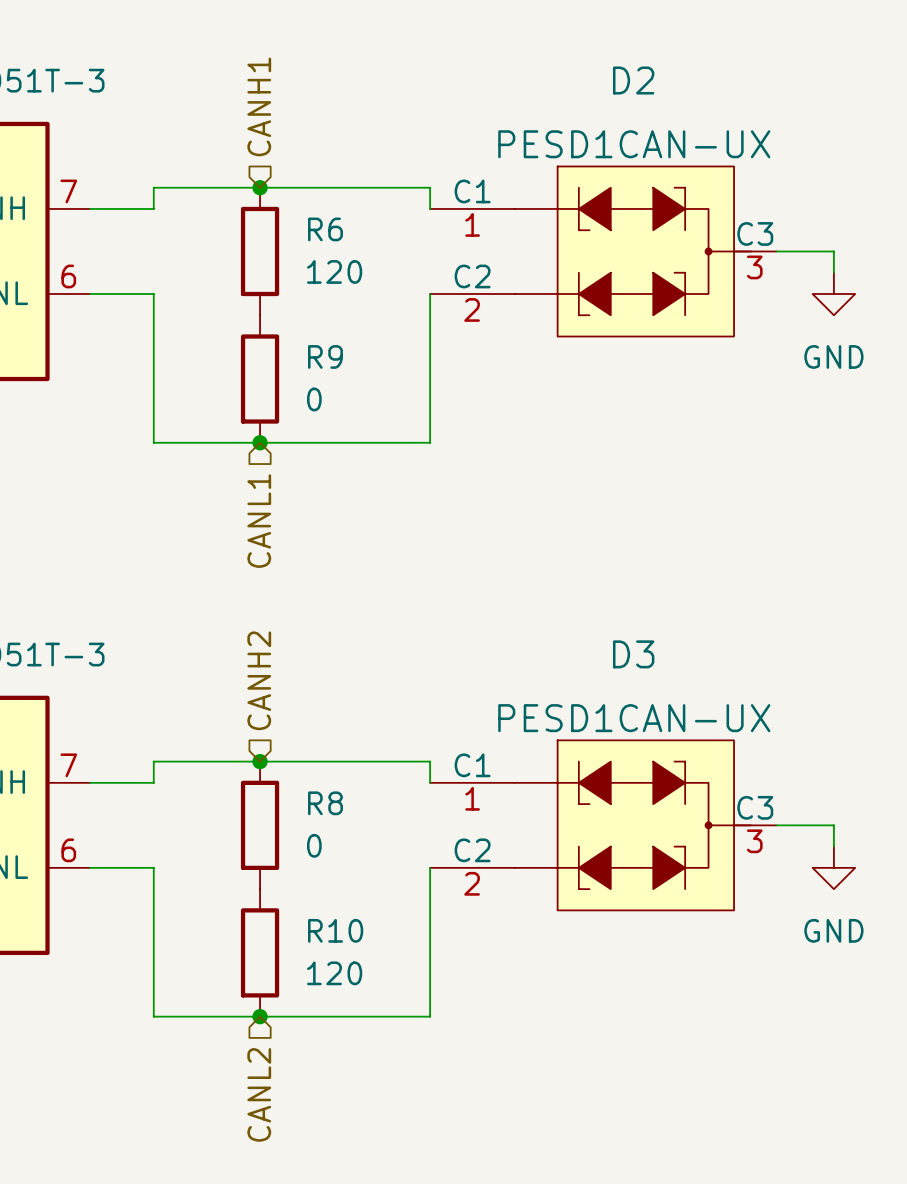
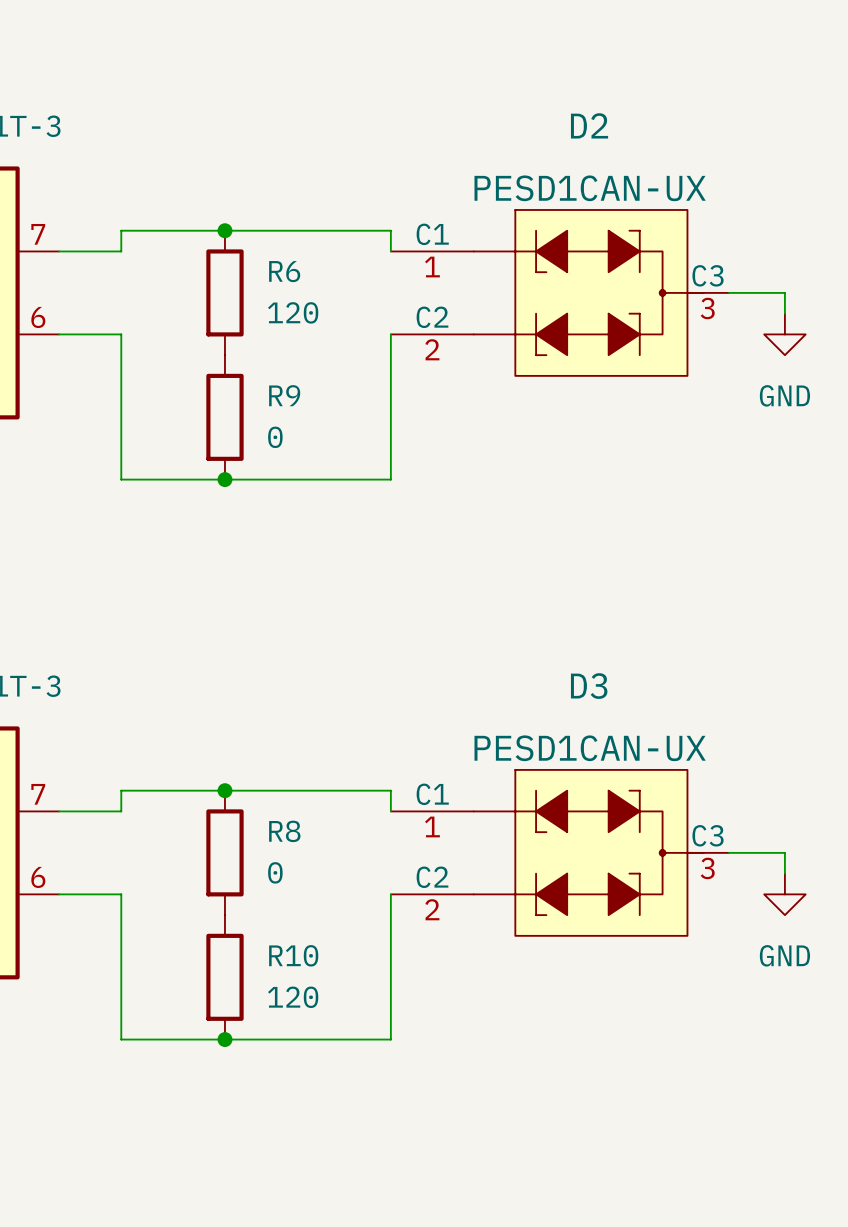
hierarchical label: CANH1 (259, 106) -> none
hierarchical label: CANL1 (259, 521) -> none
hierarchical label: CANH2 (259, 680) -> none
hierarchical label: CANL2 (259, 1094) -> none

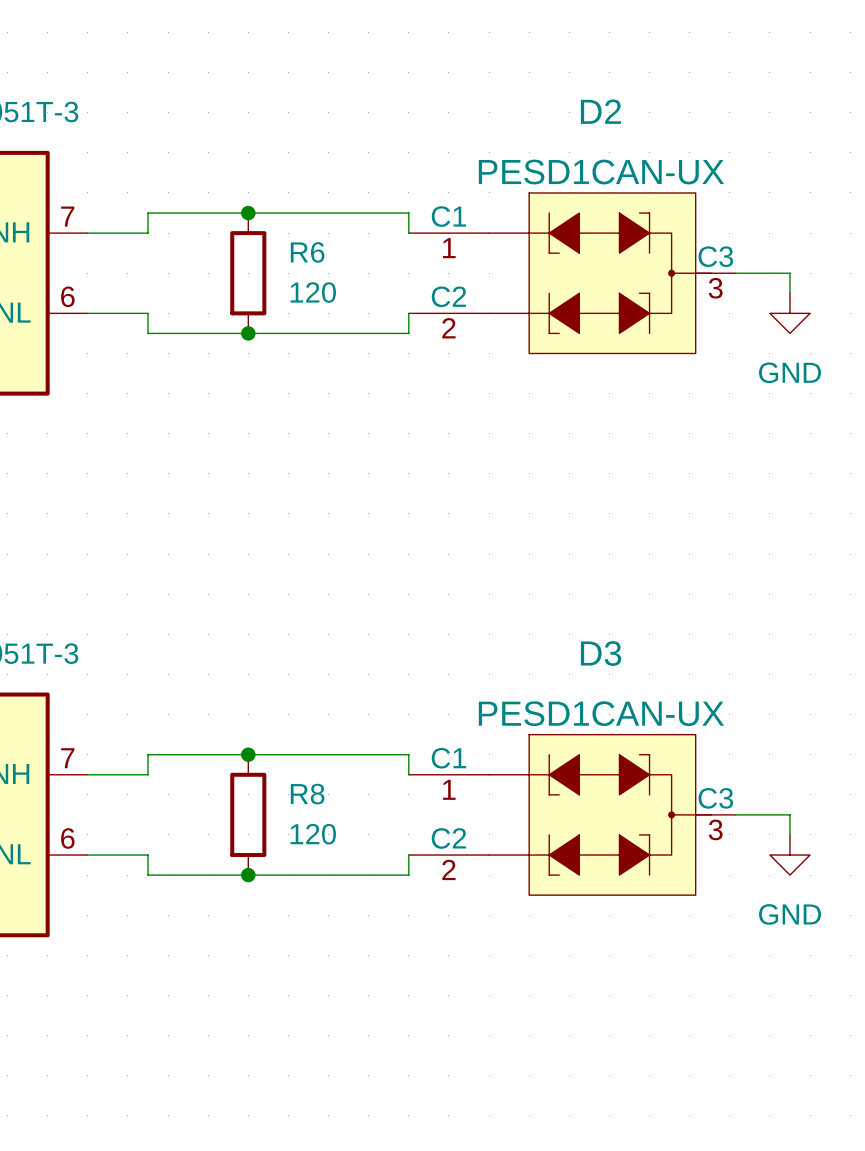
wire: (121, 355) (121, 479) (390, 479) (390, 355) -> (147, 333) (408, 333)
junction: none -> (248, 333)
R9: 0 (224, 417) -> none
junction: (224, 479) -> none
R8 value: 0 (275, 872) -> 120 (313, 834)
wire: (121, 915) (121, 1039) (390, 1039) (390, 915) -> (147, 875) (408, 875)
junction: none -> (248, 875)
R10: 120 (224, 977) -> none
junction: (224, 1039) -> none

